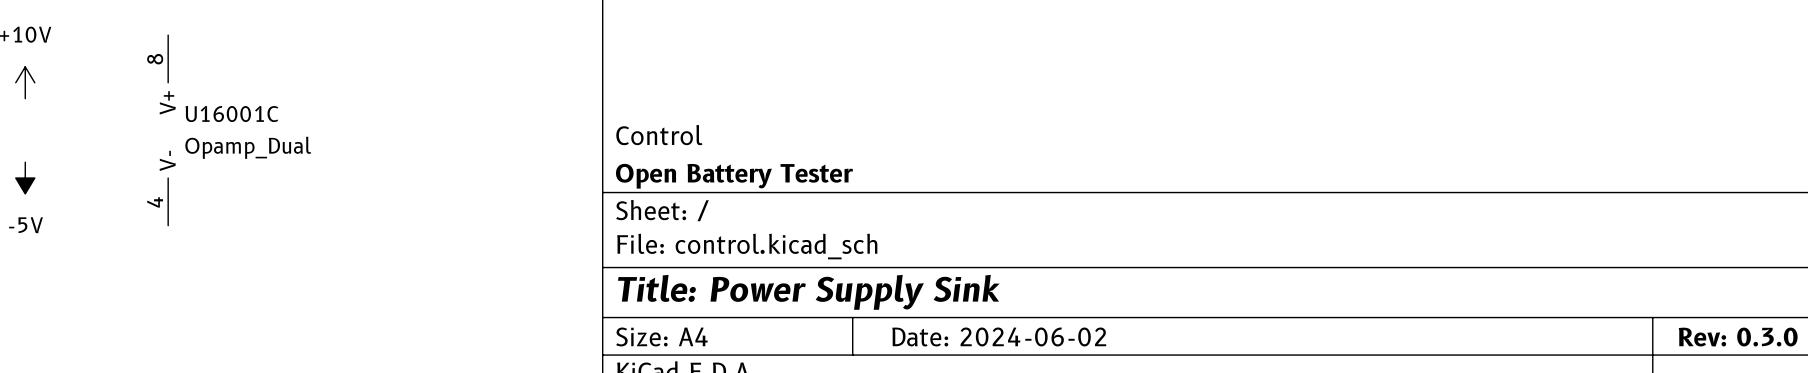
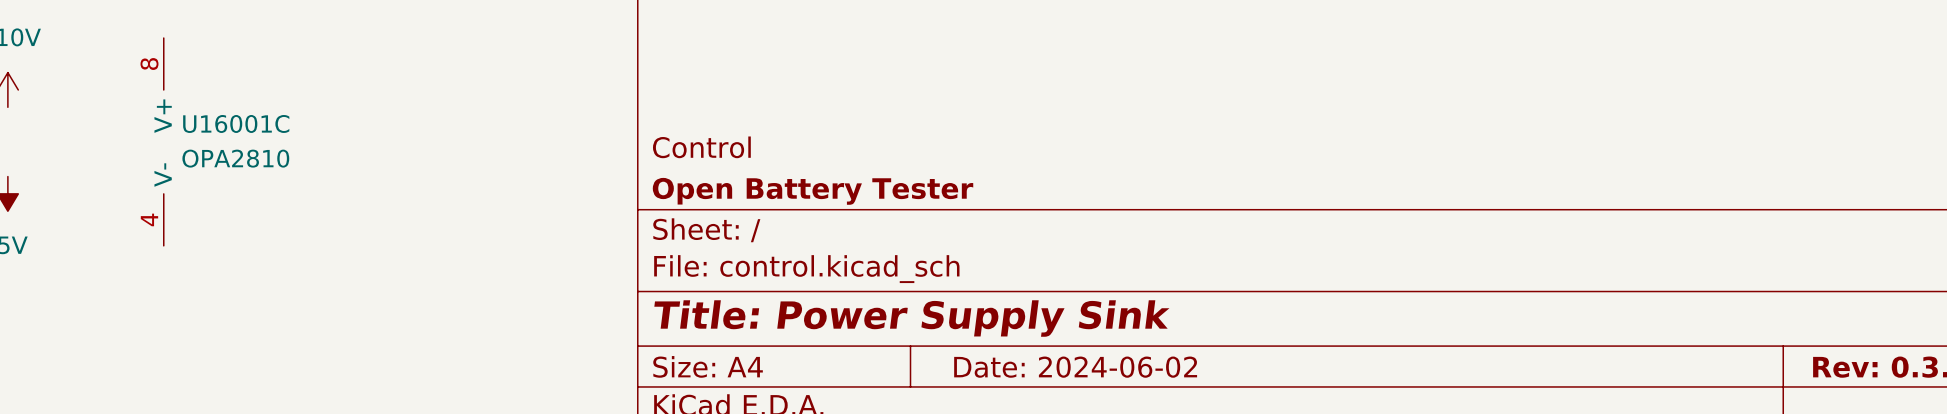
U16001C value: Opamp_Dual (248, 147) -> OPA2810 (235, 158)

